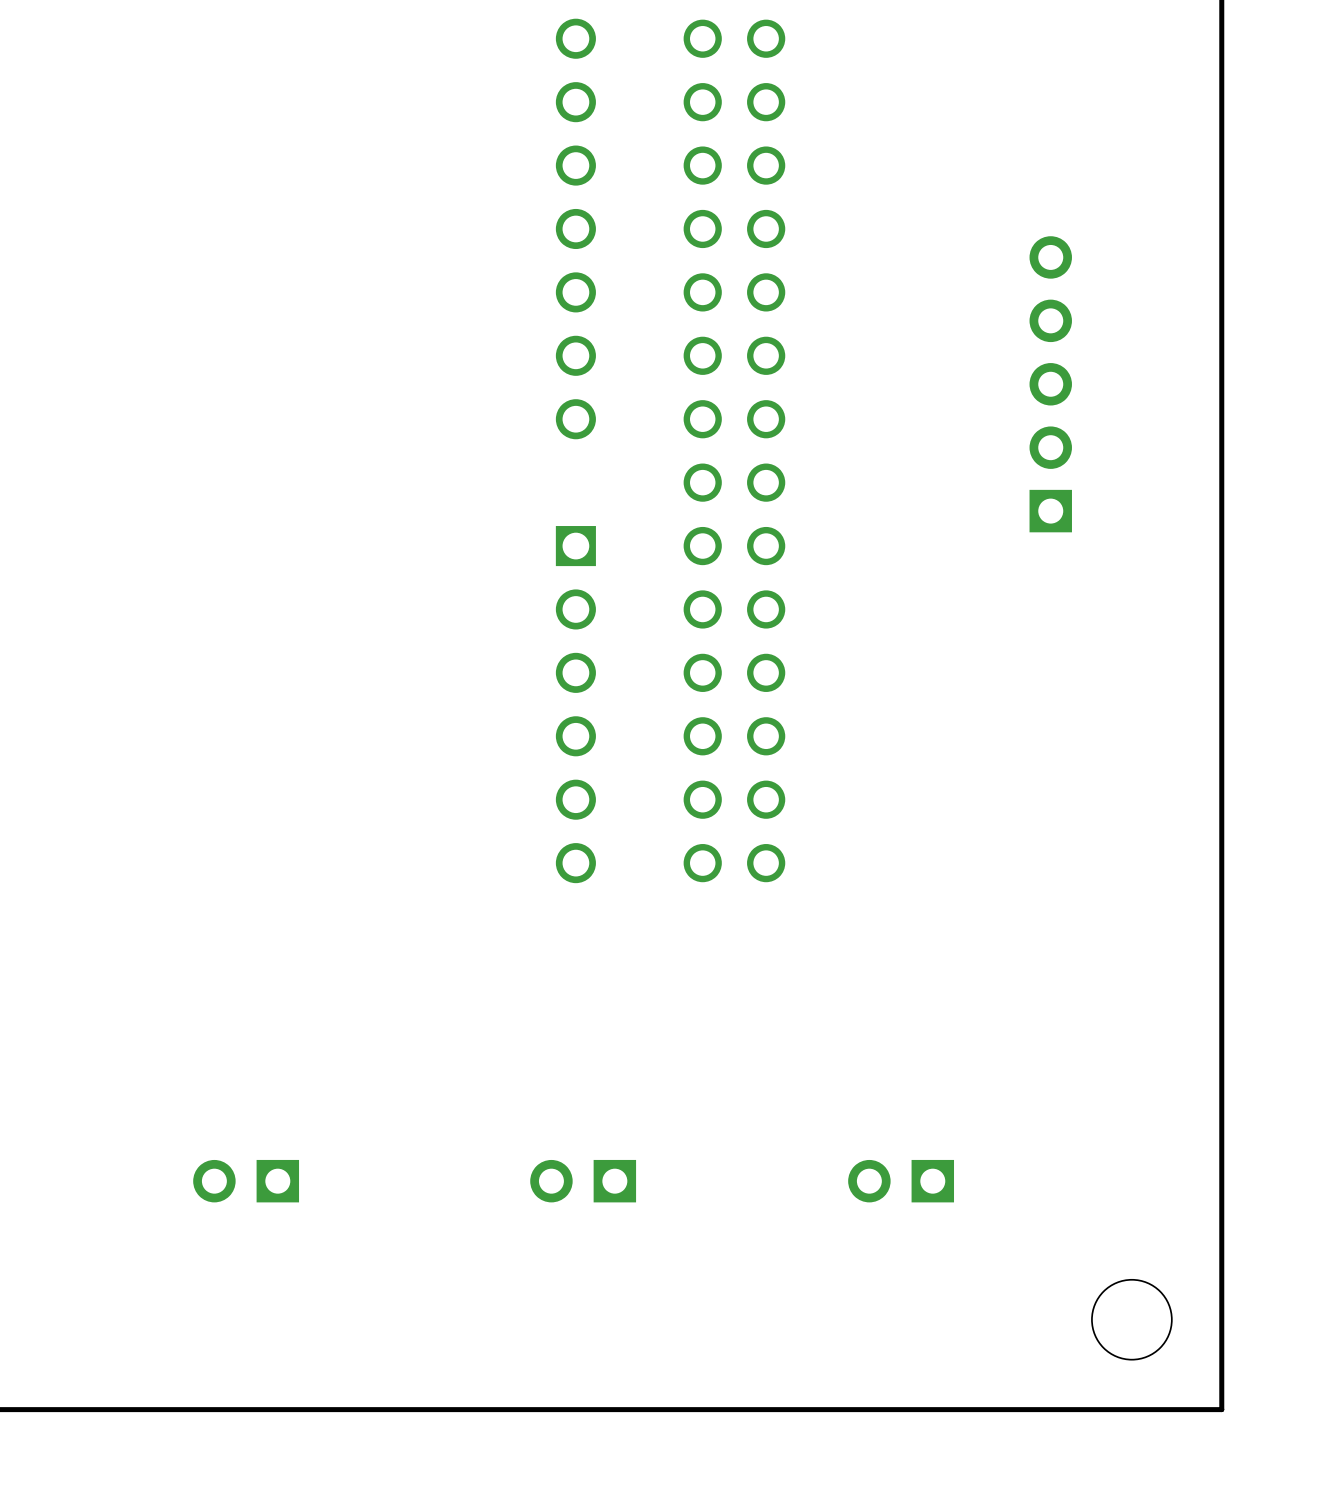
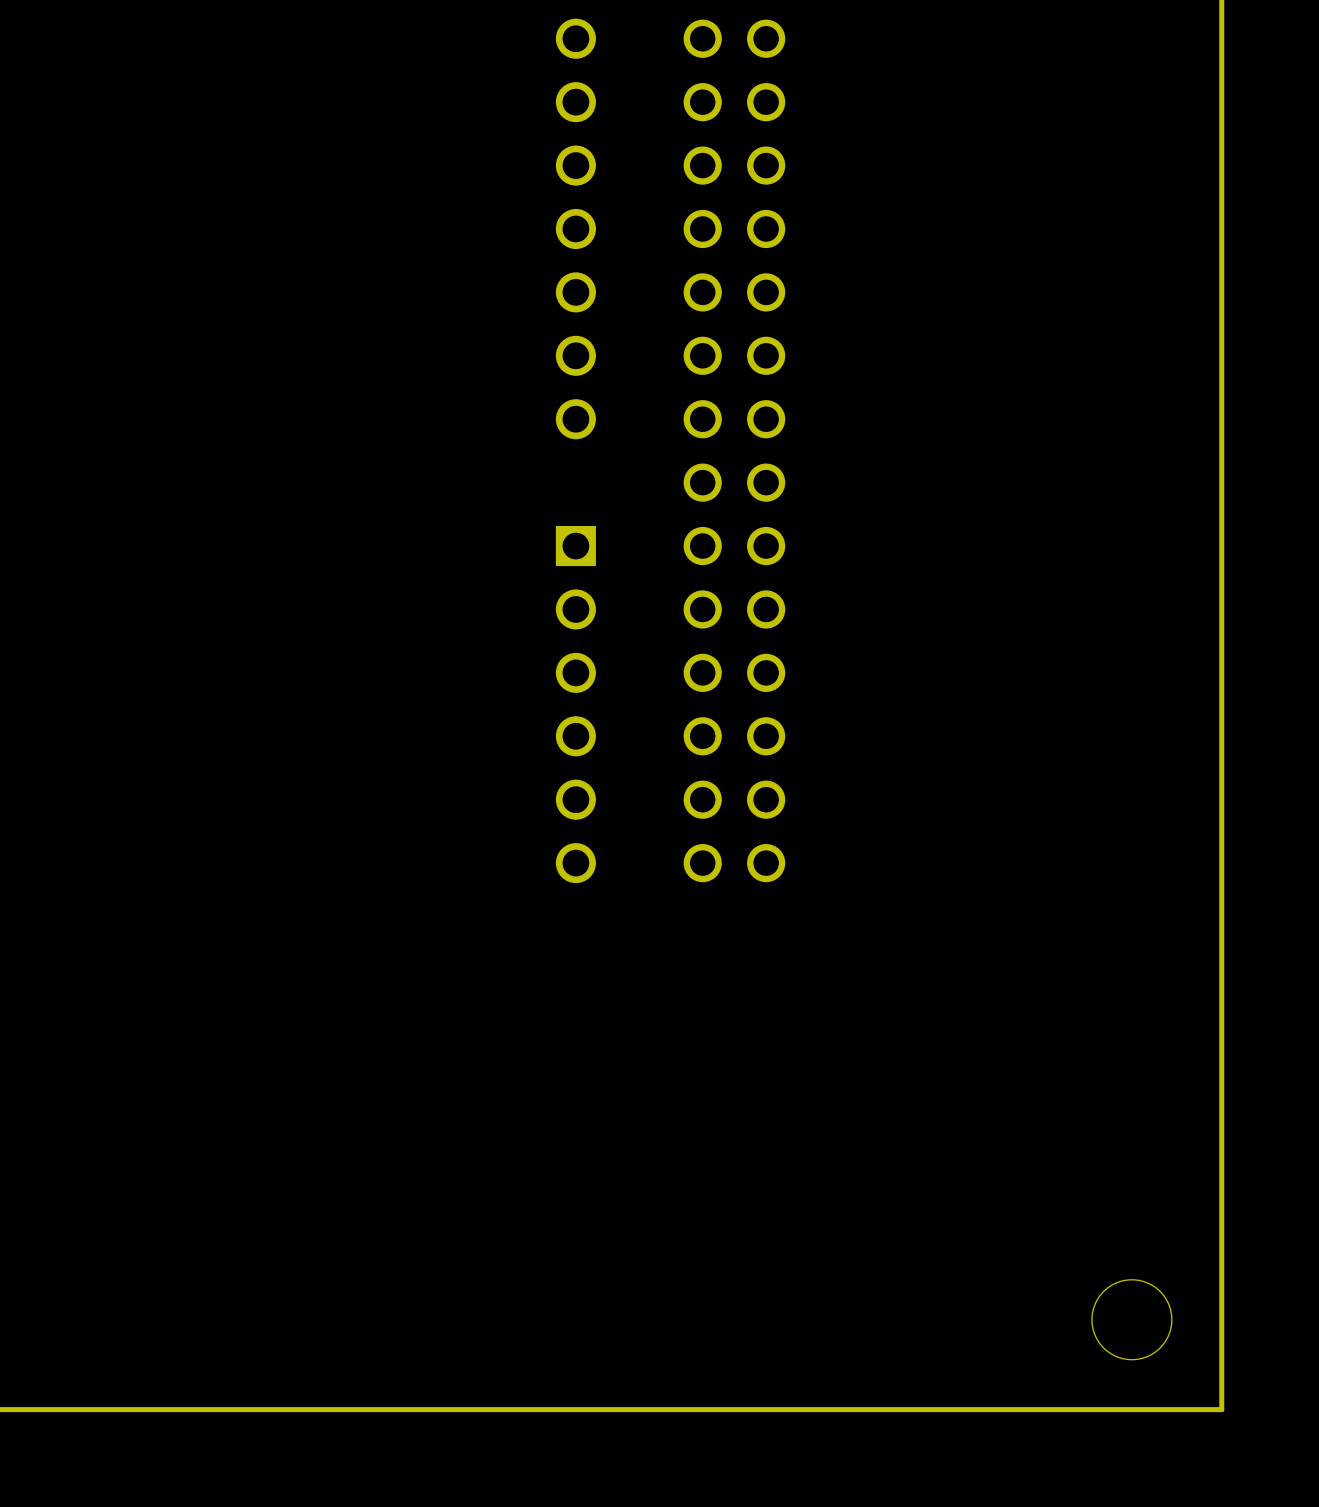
part: (1050, 384) -> none
part: (246, 1181) -> none
part: (583, 1181) -> none
part: (901, 1181) -> none

